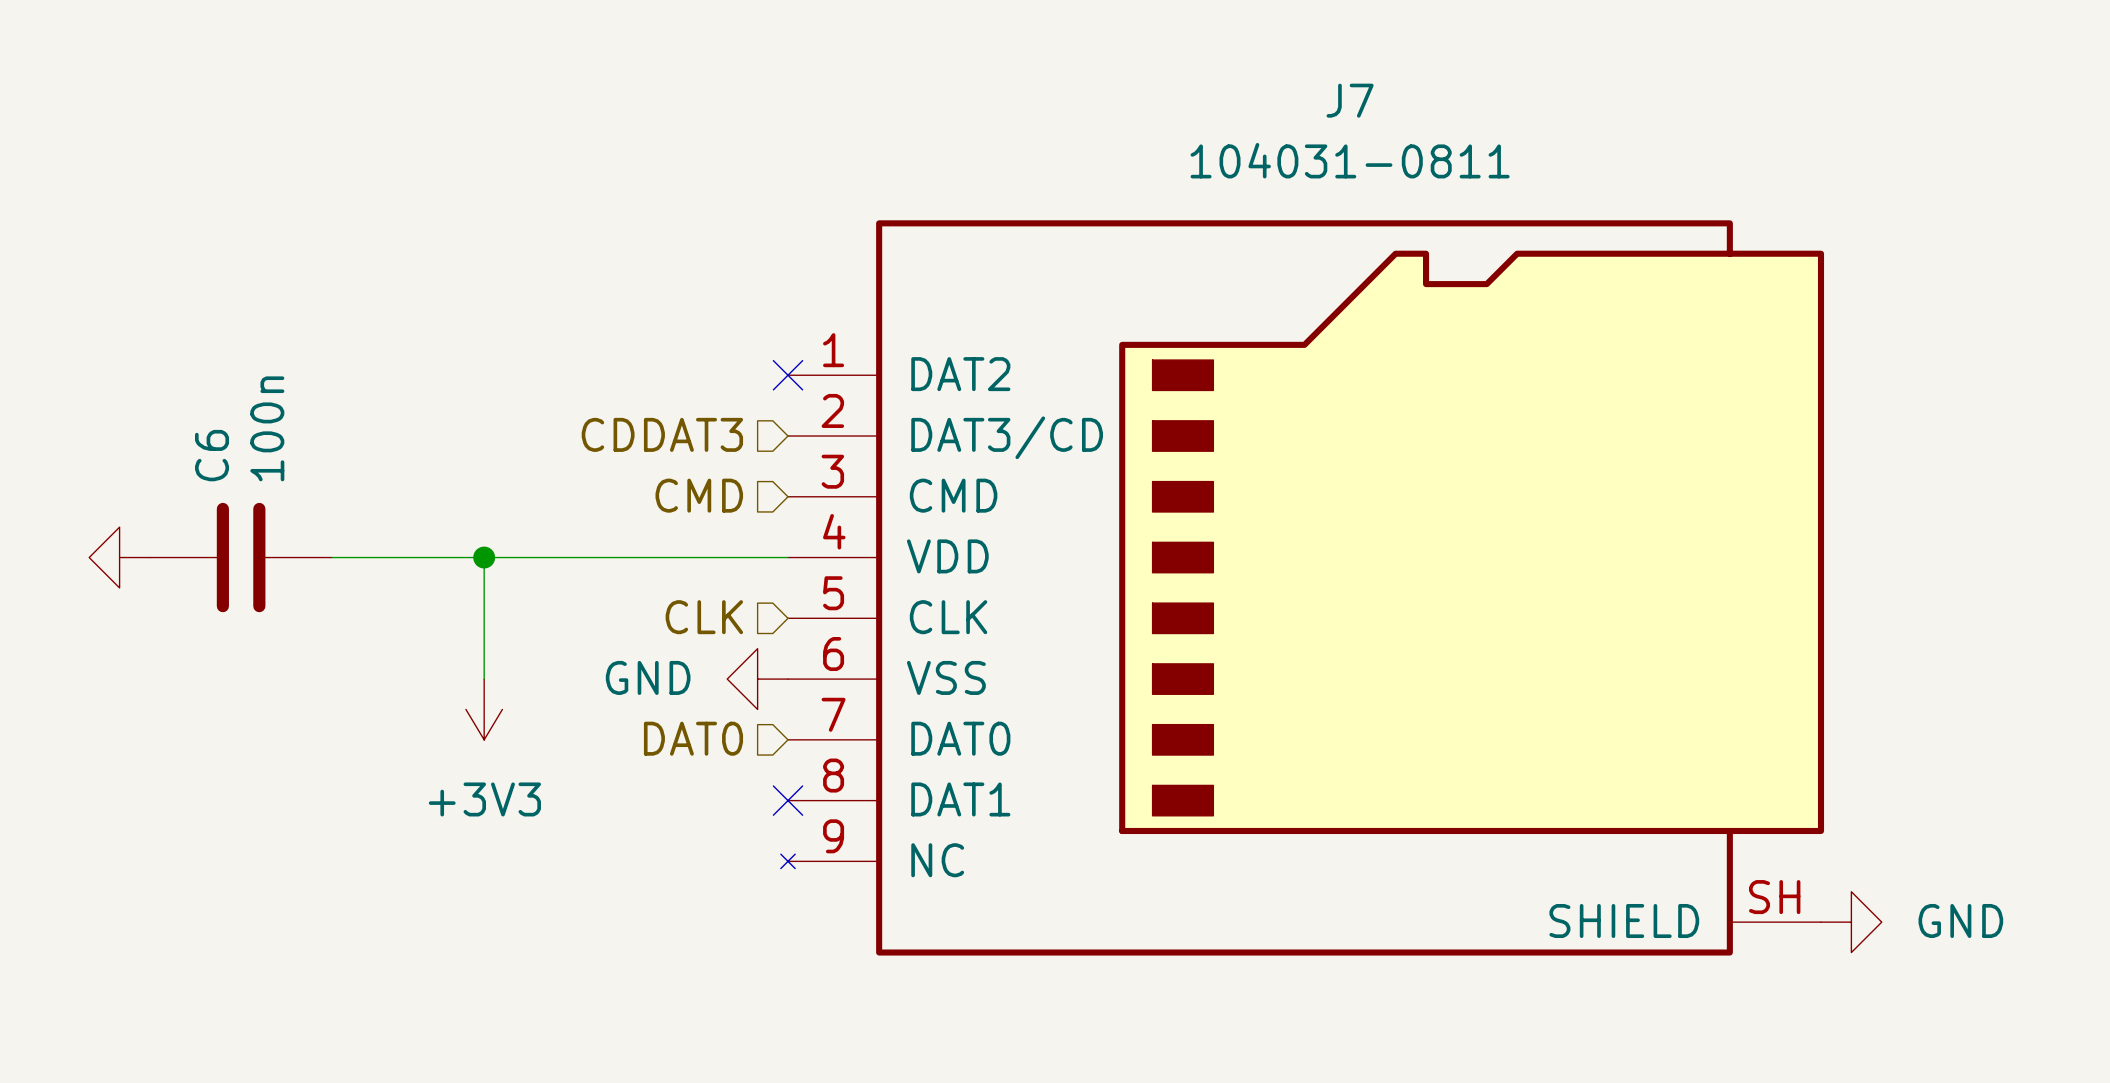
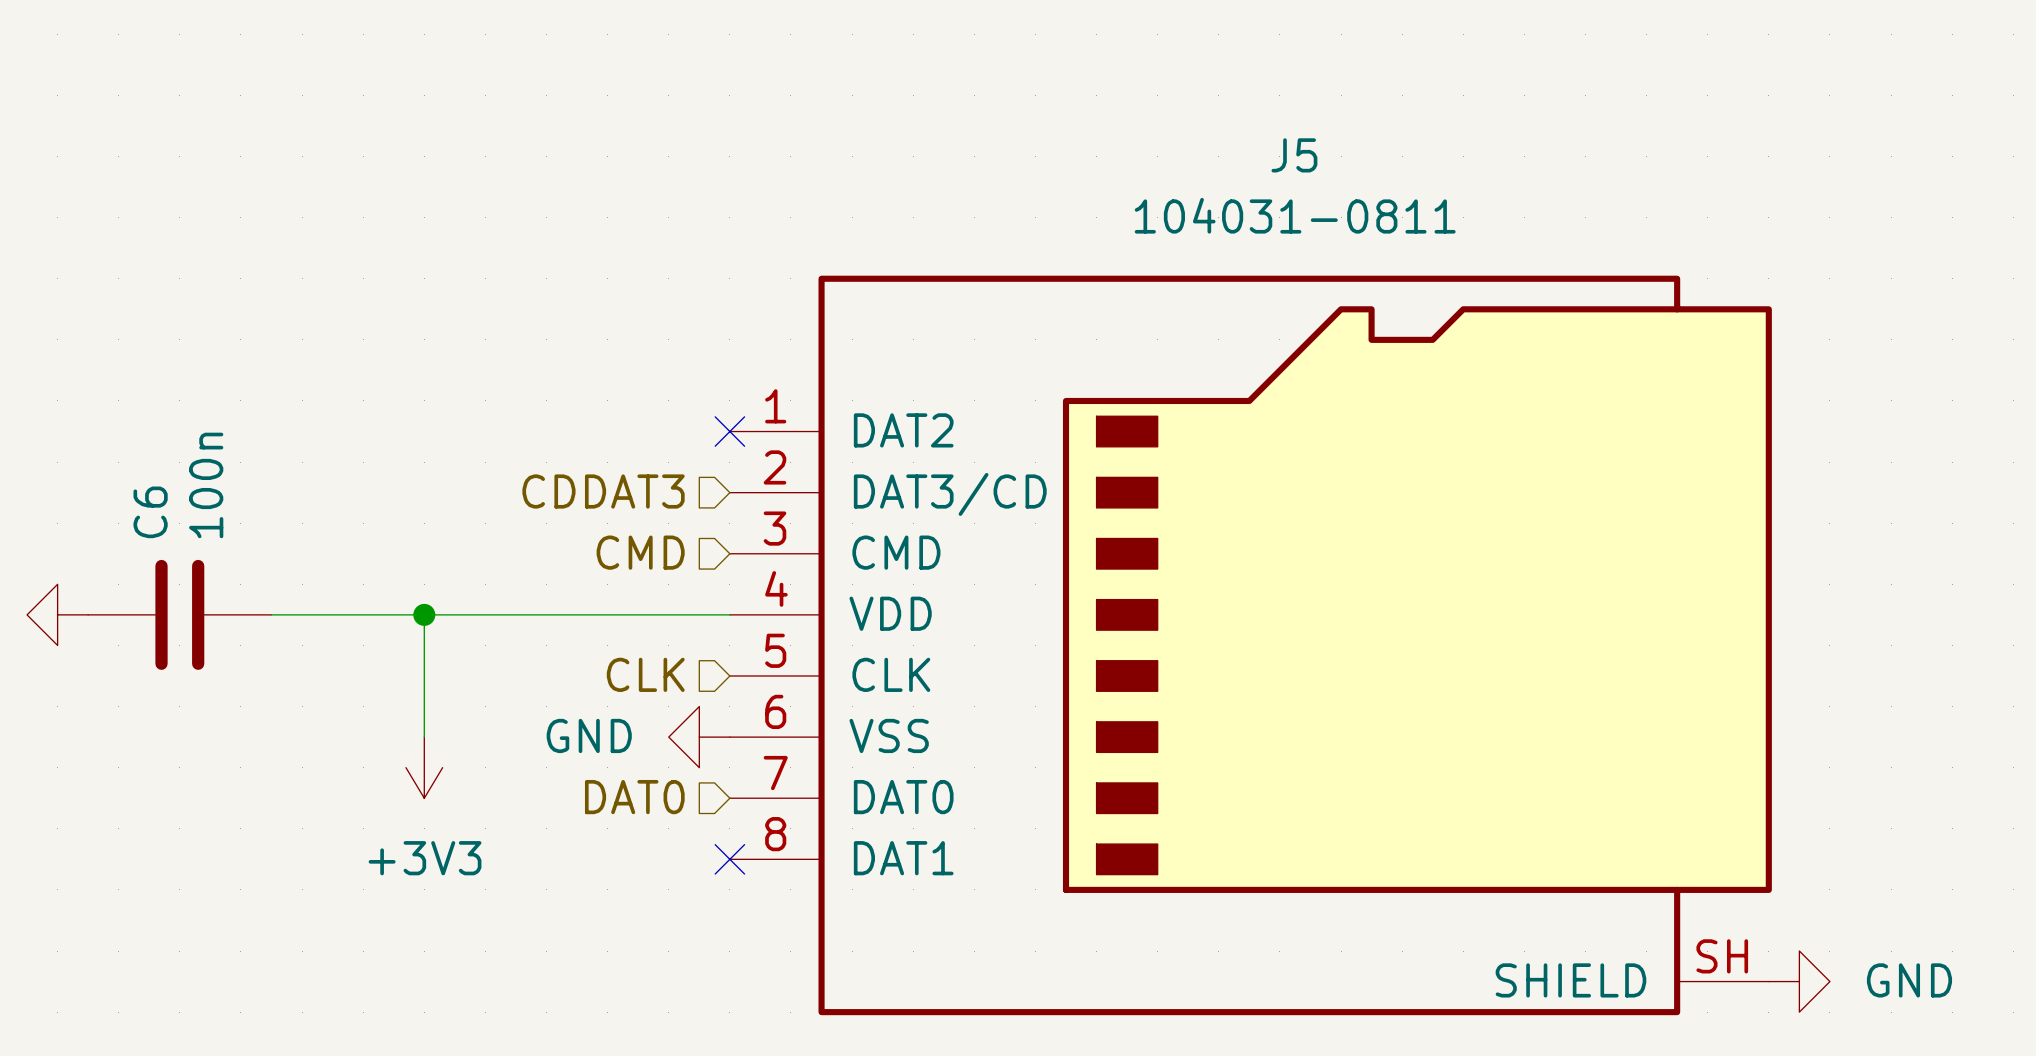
J7: 104031-0811 (1302, 587) -> none
J5: none -> 104031-0811 (1250, 645)

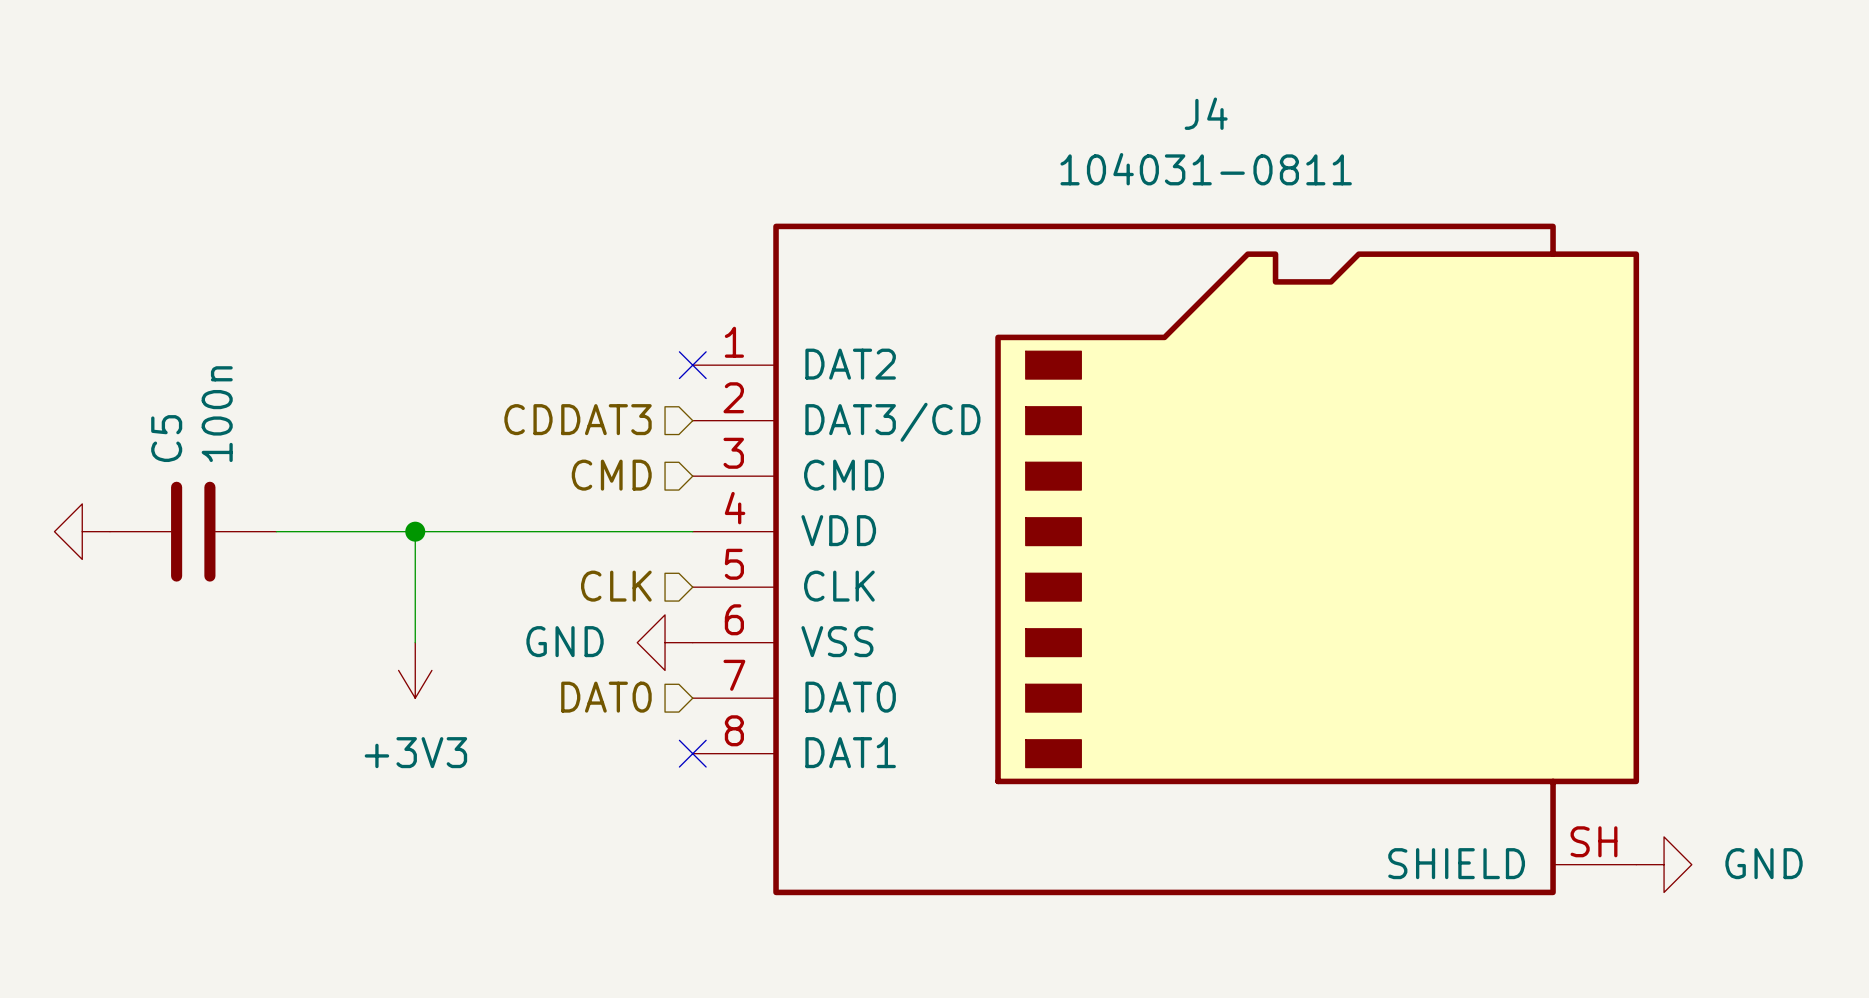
J5 name: J5 (1294, 155) -> J4 (1206, 113)
C6 name: C6 (150, 512) -> C5 (166, 438)

